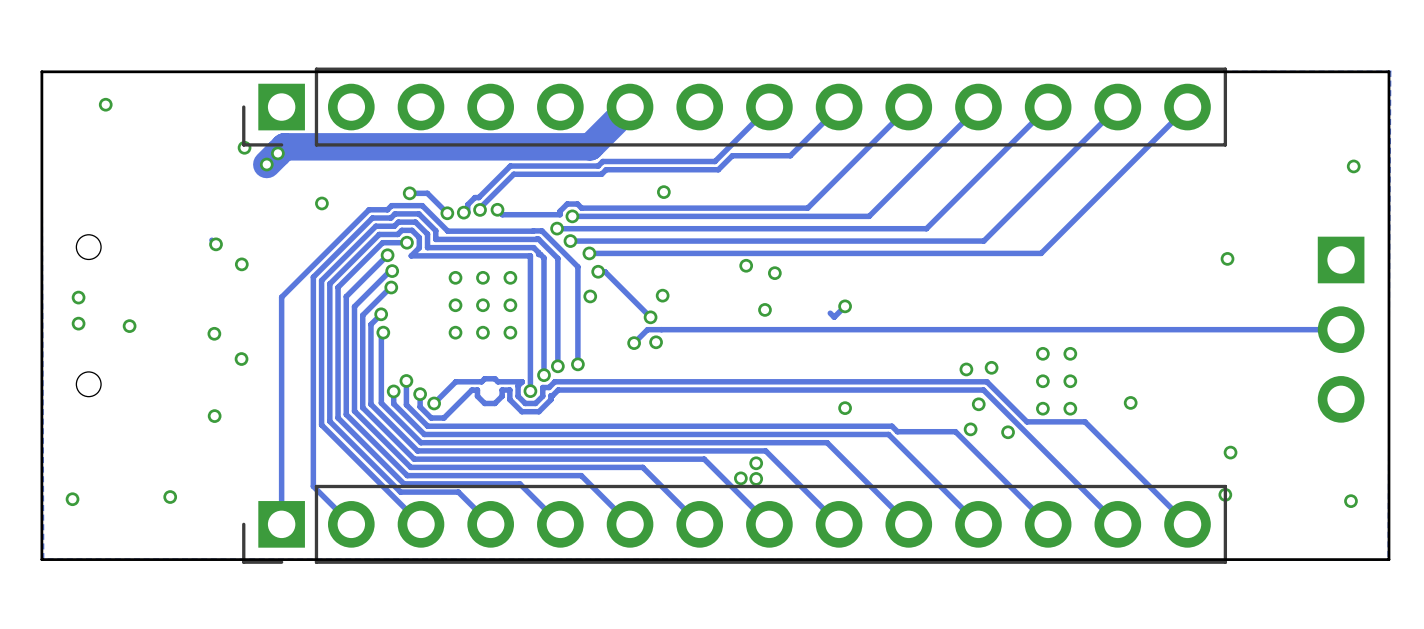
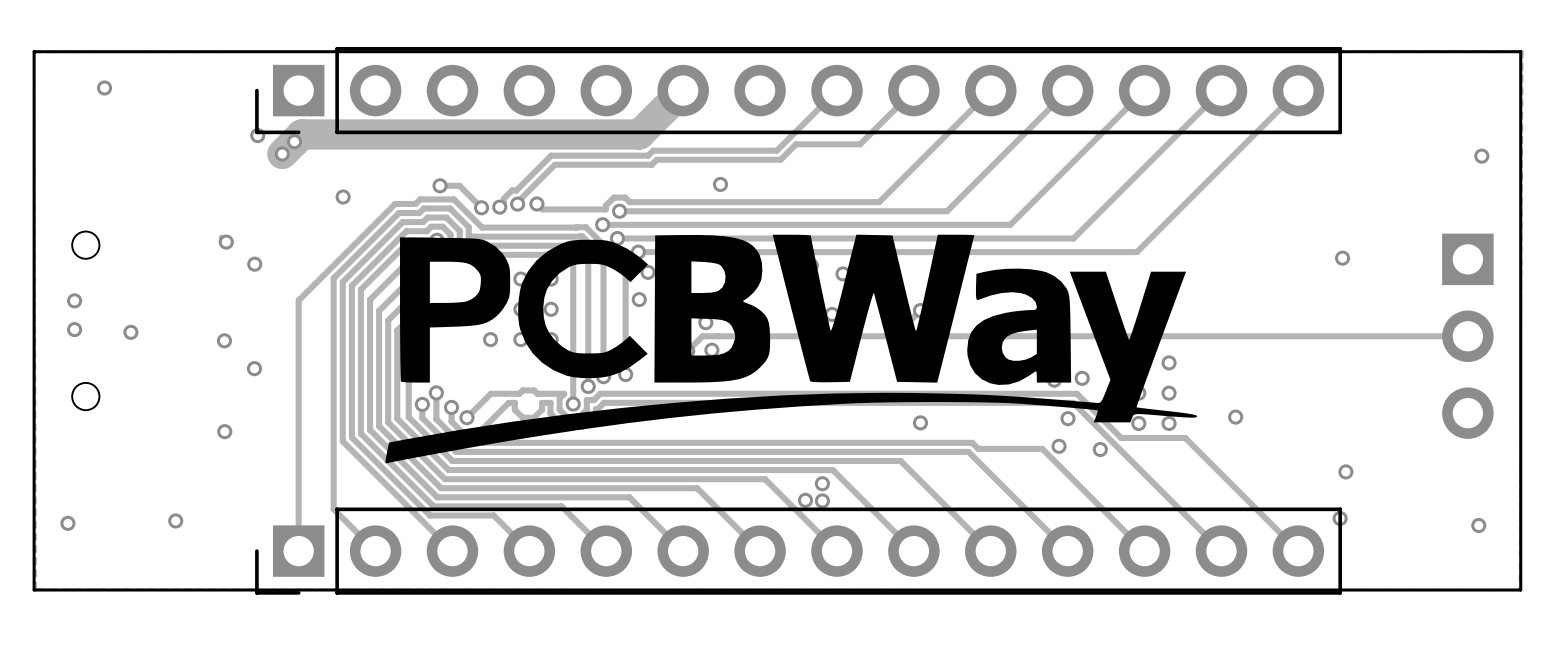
drawing: none -> [385, 234, 1198, 464]

